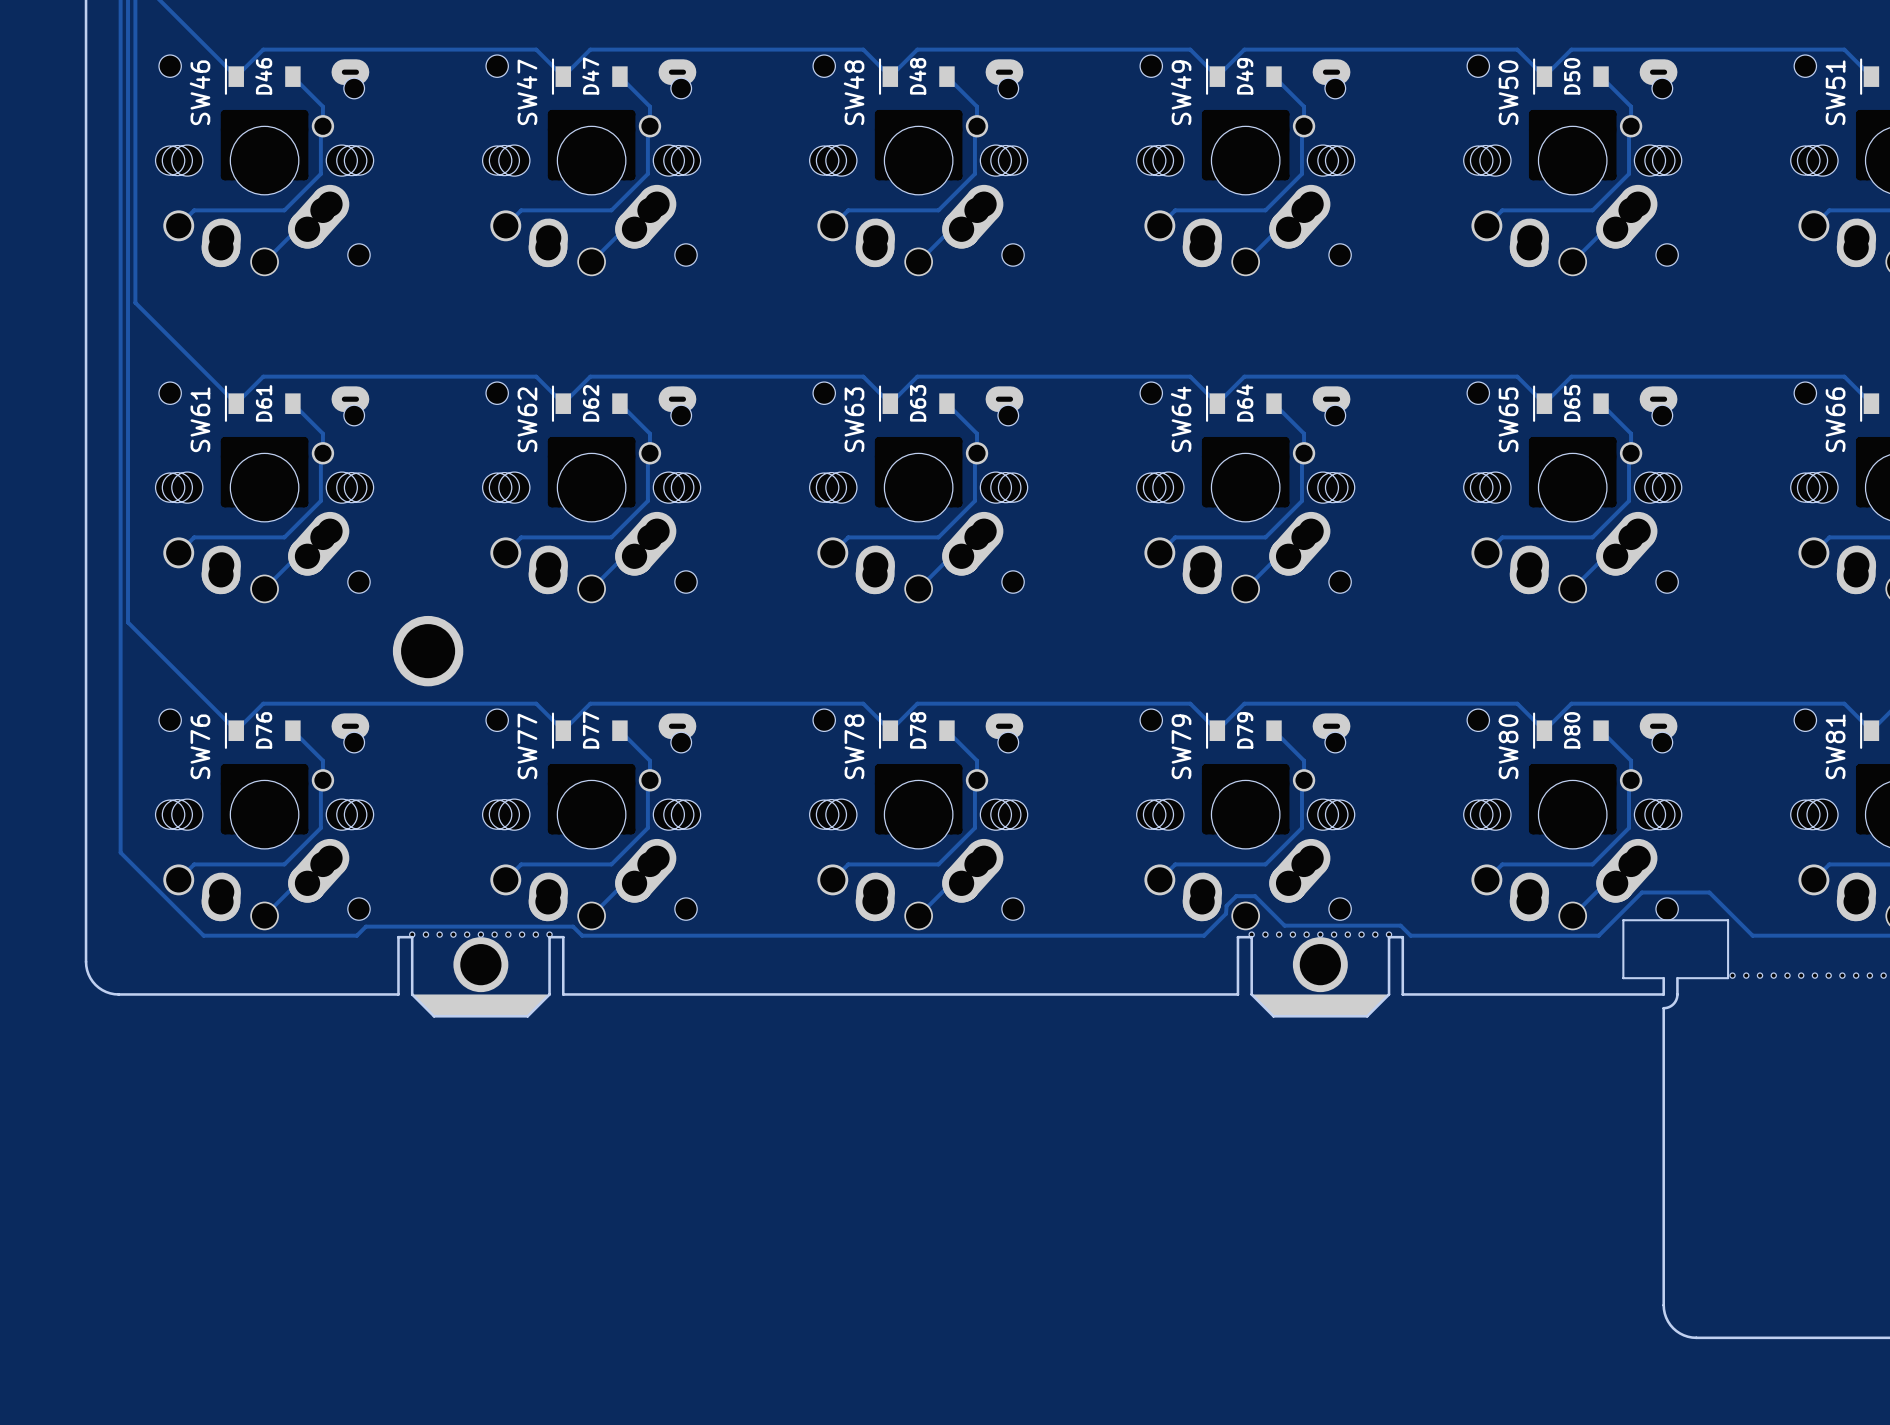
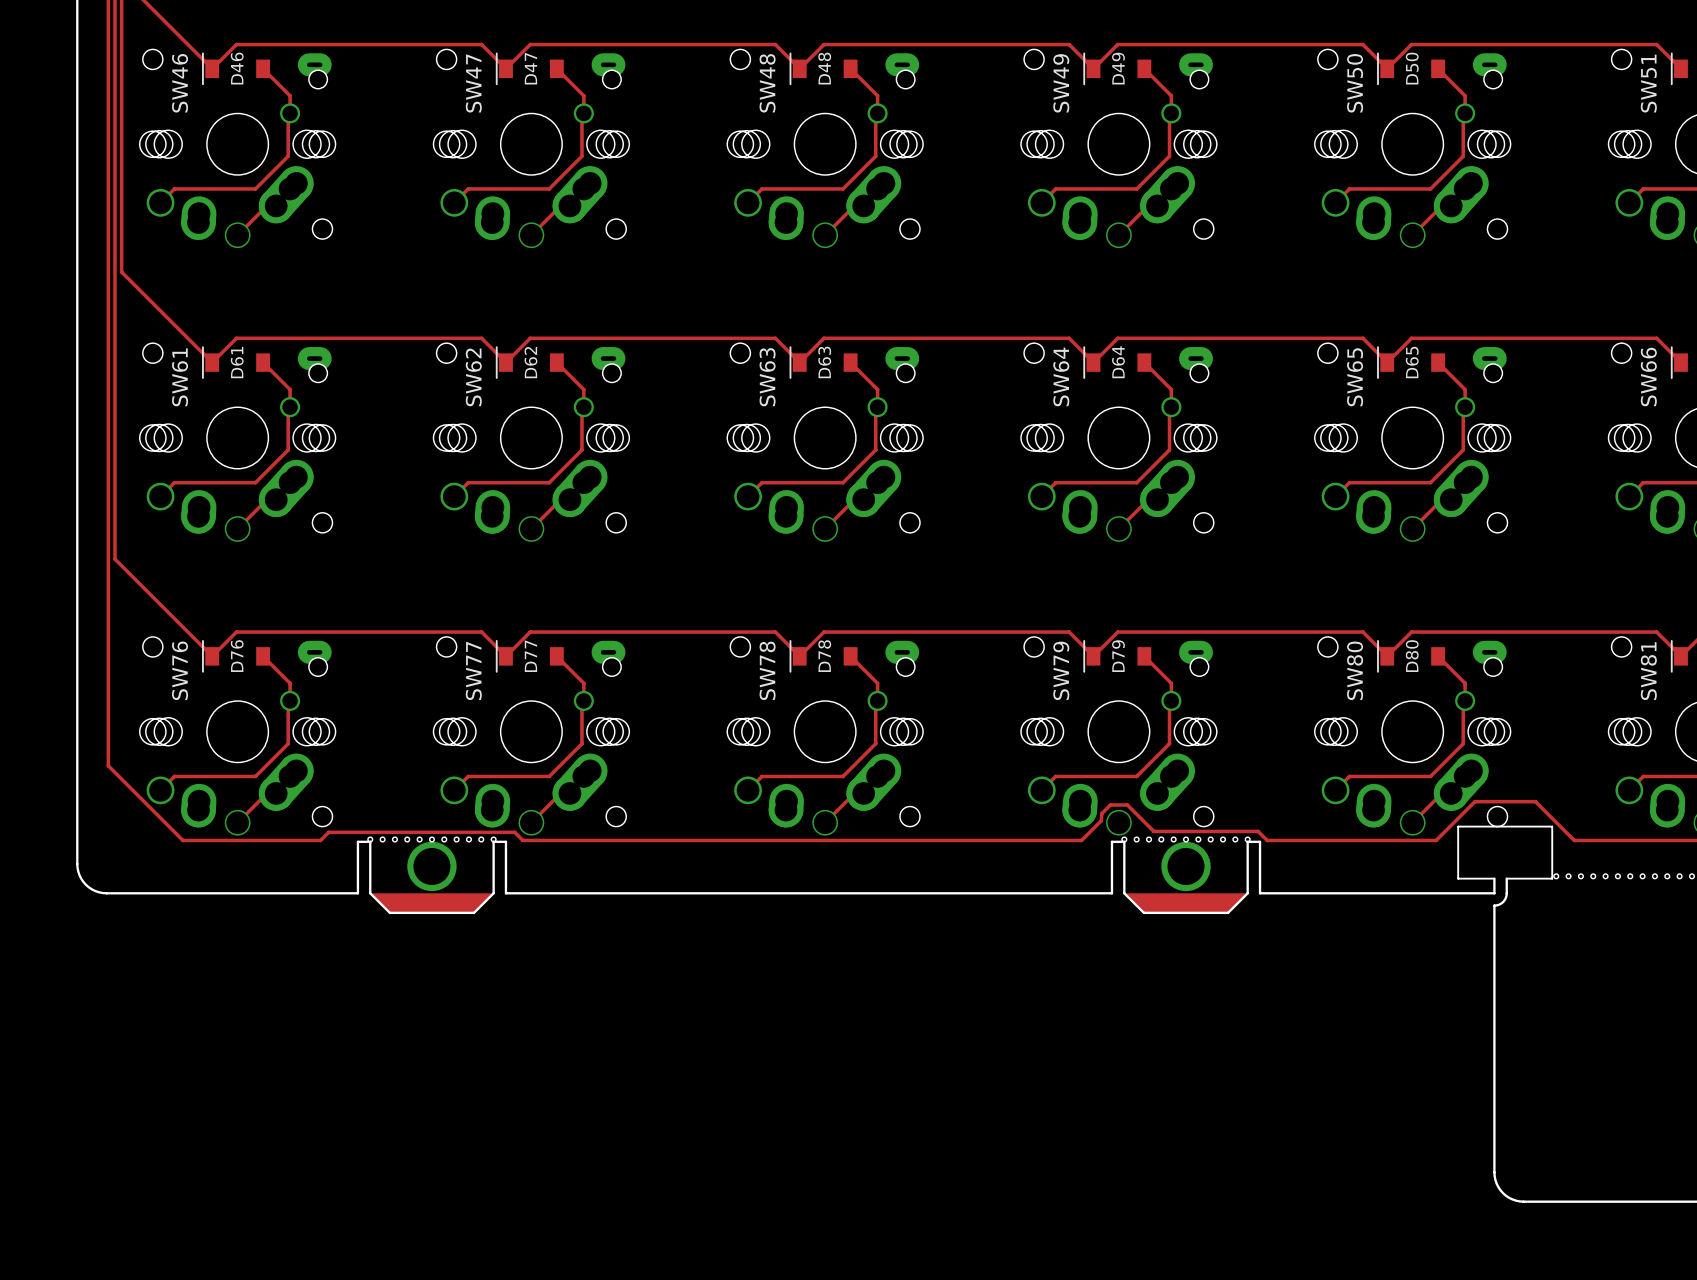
part: (428, 651) -> none

